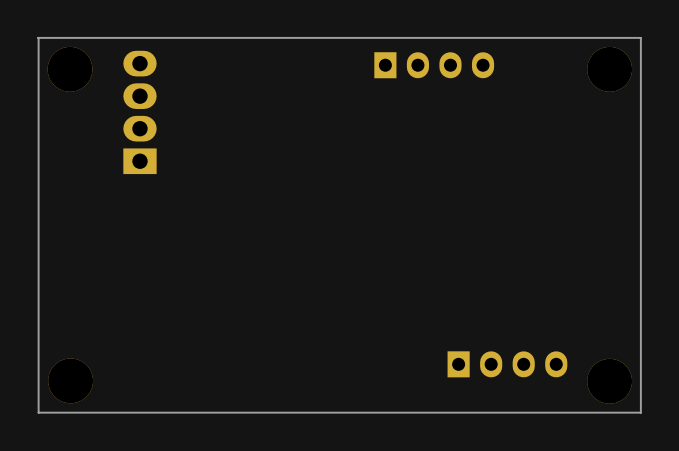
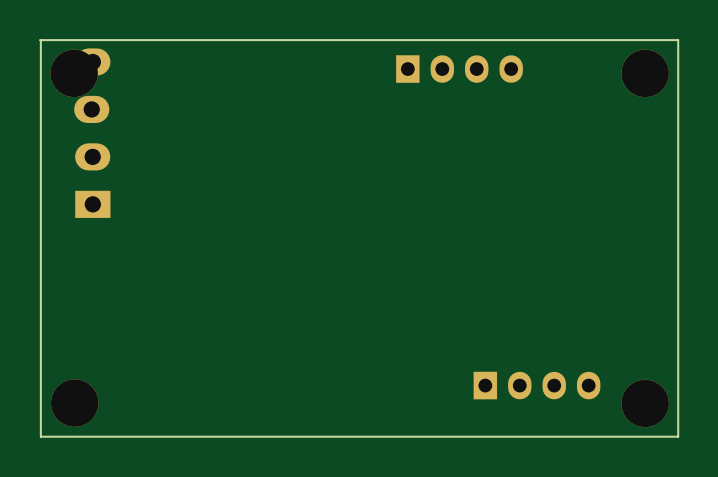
part: (139, 112) -> none
part: none -> (92, 133)

